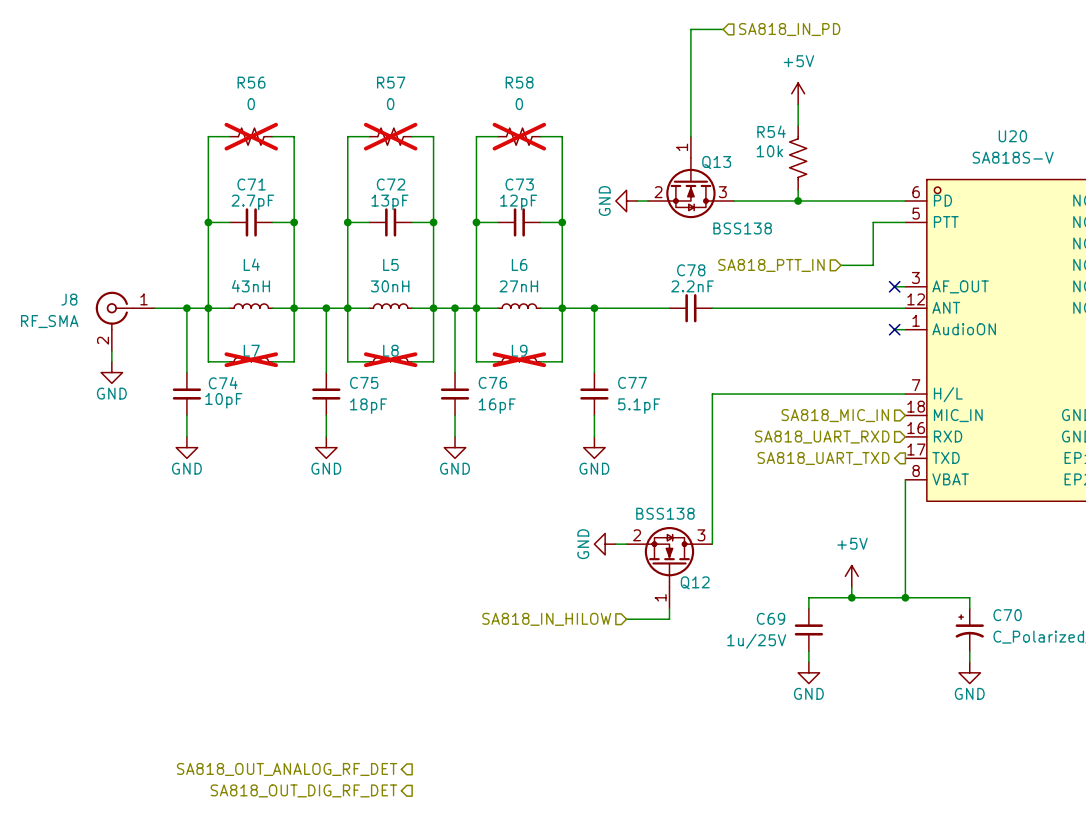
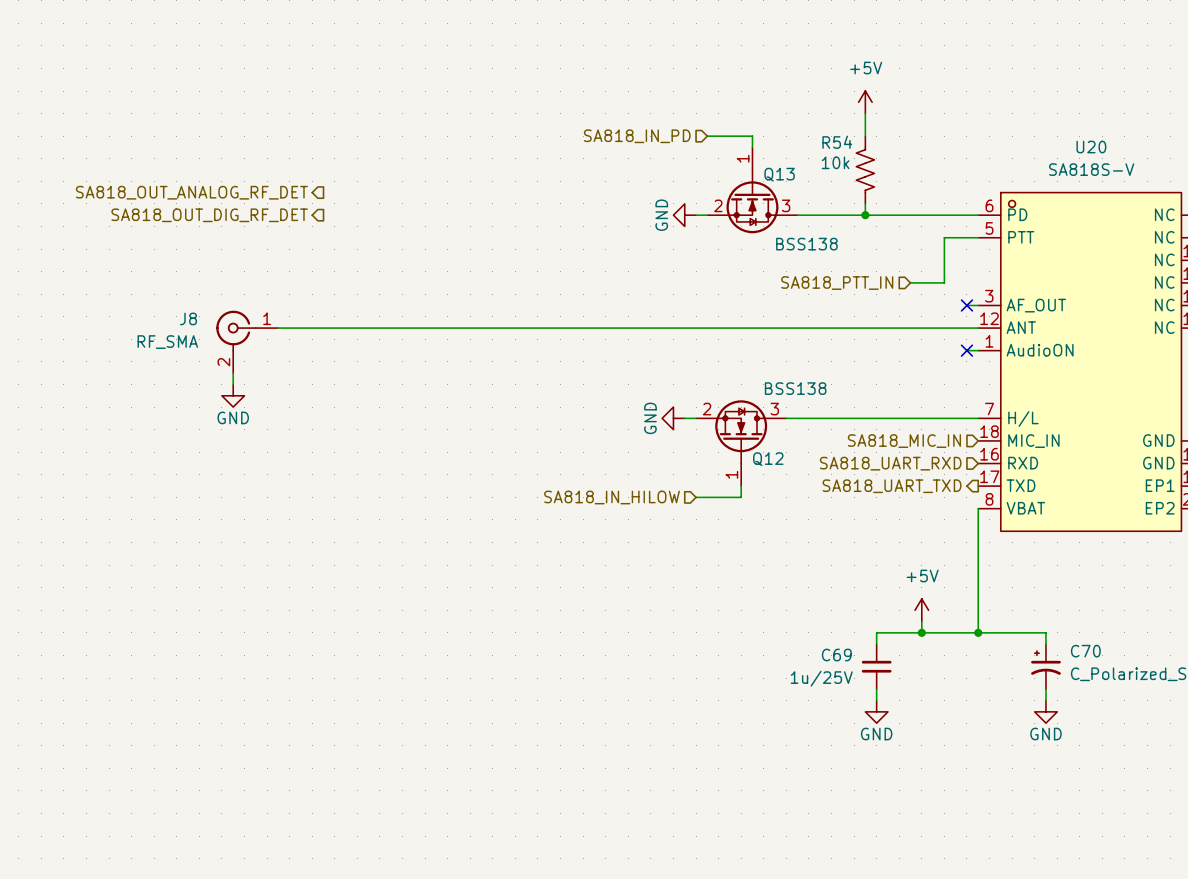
wire: (723, 29) (690, 29) (690, 125) -> (707, 136) (752, 136)
hierarchical label rotation: 0° (789, 29) -> 180° (637, 136)
hierarchical label position: SA818_IN_PD (789, 29) -> SA818_IN_PD (637, 136)
wire: (229, 136) (208, 136) (208, 361) (229, 361) -> none
R56: 0 (251, 136) -> none
wire: (272, 136) (294, 136) (294, 361) (272, 361) -> none
wire: (369, 136) (347, 136) (347, 361) (369, 361) -> none
R57: 0 (390, 136) -> none
wire: (412, 136) (433, 136) (433, 361) (412, 361) -> none
wire: (497, 136) (476, 136) (476, 361) (497, 361) -> none
R58: 0 (519, 136) -> none
wire: (540, 136) (562, 136) (562, 361) (540, 361) -> none
hierarchical label: none -> SA818_OUT_ANALOG_RF_DET (191, 192)
hierarchical label: none -> SA818_OUT_DIG_RF_DET (209, 215)
wire: (208, 222) (229, 222) -> none
junction: (208, 222) -> none
C71: 2.7pF (251, 222) -> none
wire: (272, 222) (294, 222) -> none
junction: (294, 222) -> none
wire: (347, 222) (369, 222) -> none
junction: (347, 222) -> none
C72: 13pF (390, 222) -> none
wire: (412, 222) (433, 222) -> none
junction: (433, 222) -> none
wire: (476, 222) (497, 222) -> none
junction: (476, 222) -> none
C73: 12pF (519, 222) -> none
wire: (540, 222) (562, 222) -> none
junction: (562, 222) -> none
L4: 43nH (251, 306) -> none
L5: 30nH (390, 306) -> none
L6: 27nH (519, 306) -> none
wire: (154, 308) (229, 308) -> none
wire: (186, 308) (186, 372) -> none
junction: (186, 308) -> none
junction: (208, 308) -> none
wire: none -> (278, 328) (312, 328)
junction: (294, 308) -> none
wire: (326, 308) (326, 372) -> none
junction: (326, 308) -> none
junction: (347, 308) -> none
wire: none -> (413, 328) (458, 328)
junction: (433, 308) -> none
wire: (455, 308) (455, 372) -> none
junction: (455, 308) -> none
junction: (476, 308) -> none
wire: none -> (549, 328) (594, 328)
junction: (562, 308) -> none
wire: (594, 308) (594, 372) -> none
junction: (594, 308) -> none
C78: 2.2nF (690, 308) -> none
J8 position: (125, 321) -> (247, 341)
wire: (111, 351) (111, 361) -> (233, 373) (233, 384)
L7: (251, 359) -> none
L8: (390, 359) -> none
L9: (519, 359) -> none
power symbol: GND (111, 372) -> none
power symbol: none -> GND (233, 395)
C74: 10pF (186, 394) -> none
C75: 18pF (326, 394) -> none
C76: 16pF (455, 394) -> none
C77: 5.1pF (594, 394) -> none
wire: (723, 394) (712, 394) (712, 544) -> none
wire: (186, 415) (186, 436) -> none
wire: (326, 415) (326, 436) -> none
wire: (455, 415) (455, 436) -> none
wire: (594, 415) (594, 436) -> none
power symbol: GND (186, 447) -> none
power symbol: GND (326, 447) -> none
power symbol: GND (455, 447) -> none
power symbol rotation: 0° (594, 447) -> 90° clockwise (673, 418)
power symbol position: GND (594, 447) -> GND (673, 418)
Q12 value position: BSS138 (665, 513) -> BSS138 (795, 388)
power symbol: GND (605, 544) -> none
wire: (615, 544) (626, 544) -> (684, 418) (696, 418)
Q12 position: (669, 567) -> (741, 443)
wire: (669, 608) (669, 619) (626, 619) -> (741, 486) (741, 497) (696, 497)
hierarchical label position: SA818_IN_HILOW (546, 619) -> SA818_IN_HILOW (612, 497)
hierarchical label: SA818_OUT_ANALOG_RF_DET (287, 769) -> none
hierarchical label: SA818_OUT_DIG_RF_DET (303, 790) -> none

